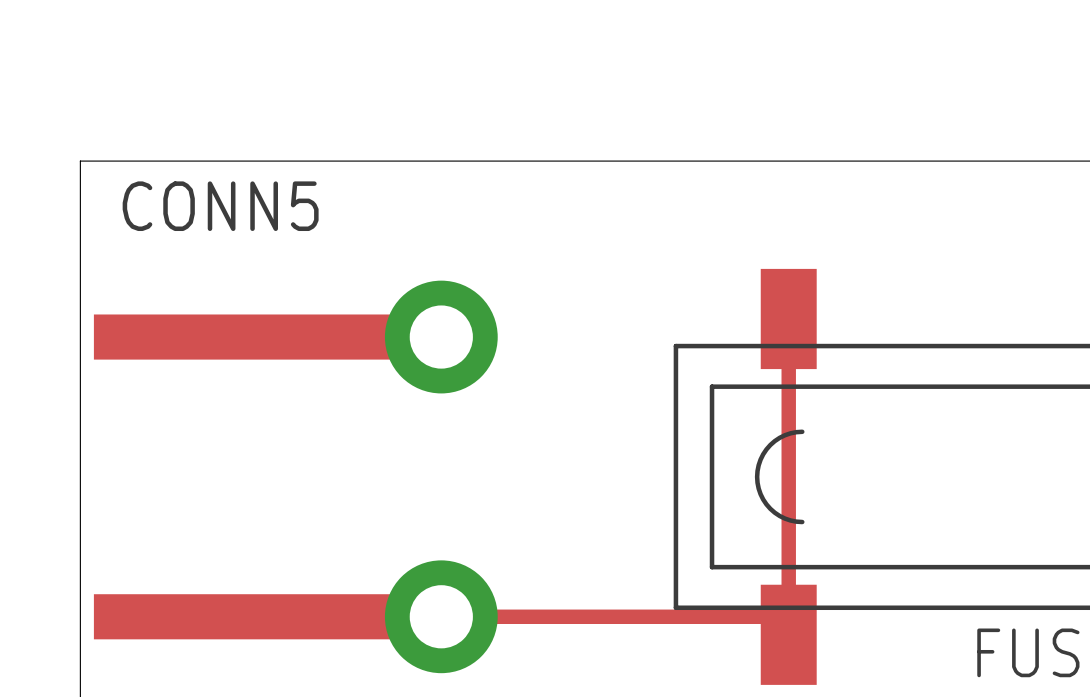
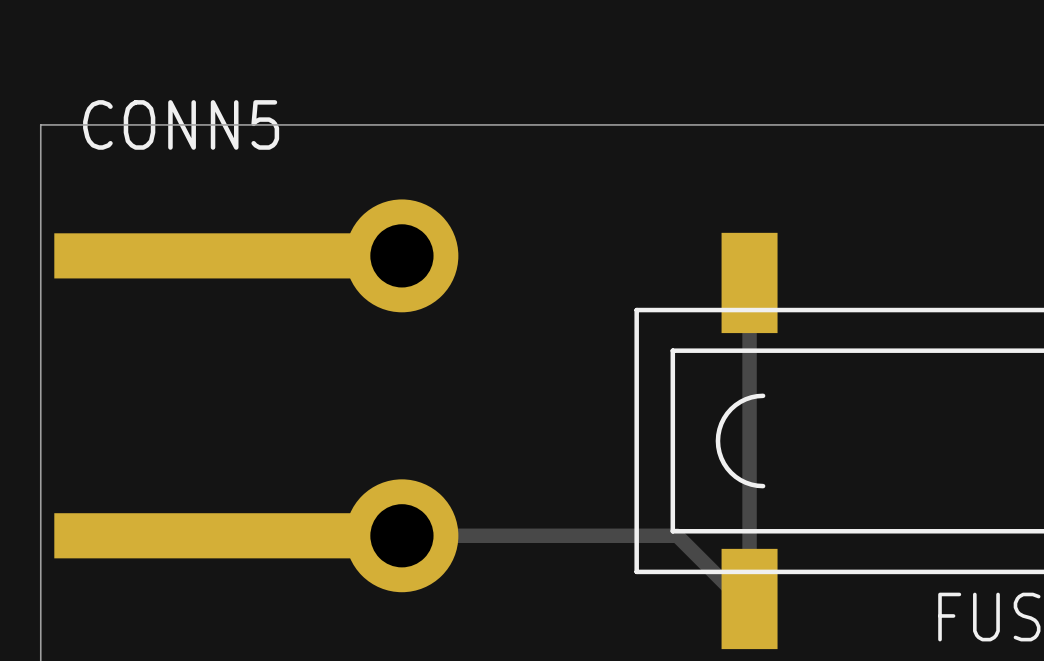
CONN5 position: (295, 476) -> (256, 395)
track: (251, 616) (770, 616) (788, 634) -> (212, 535) (677, 535) (763, 621) (763, 612) (749, 598)

